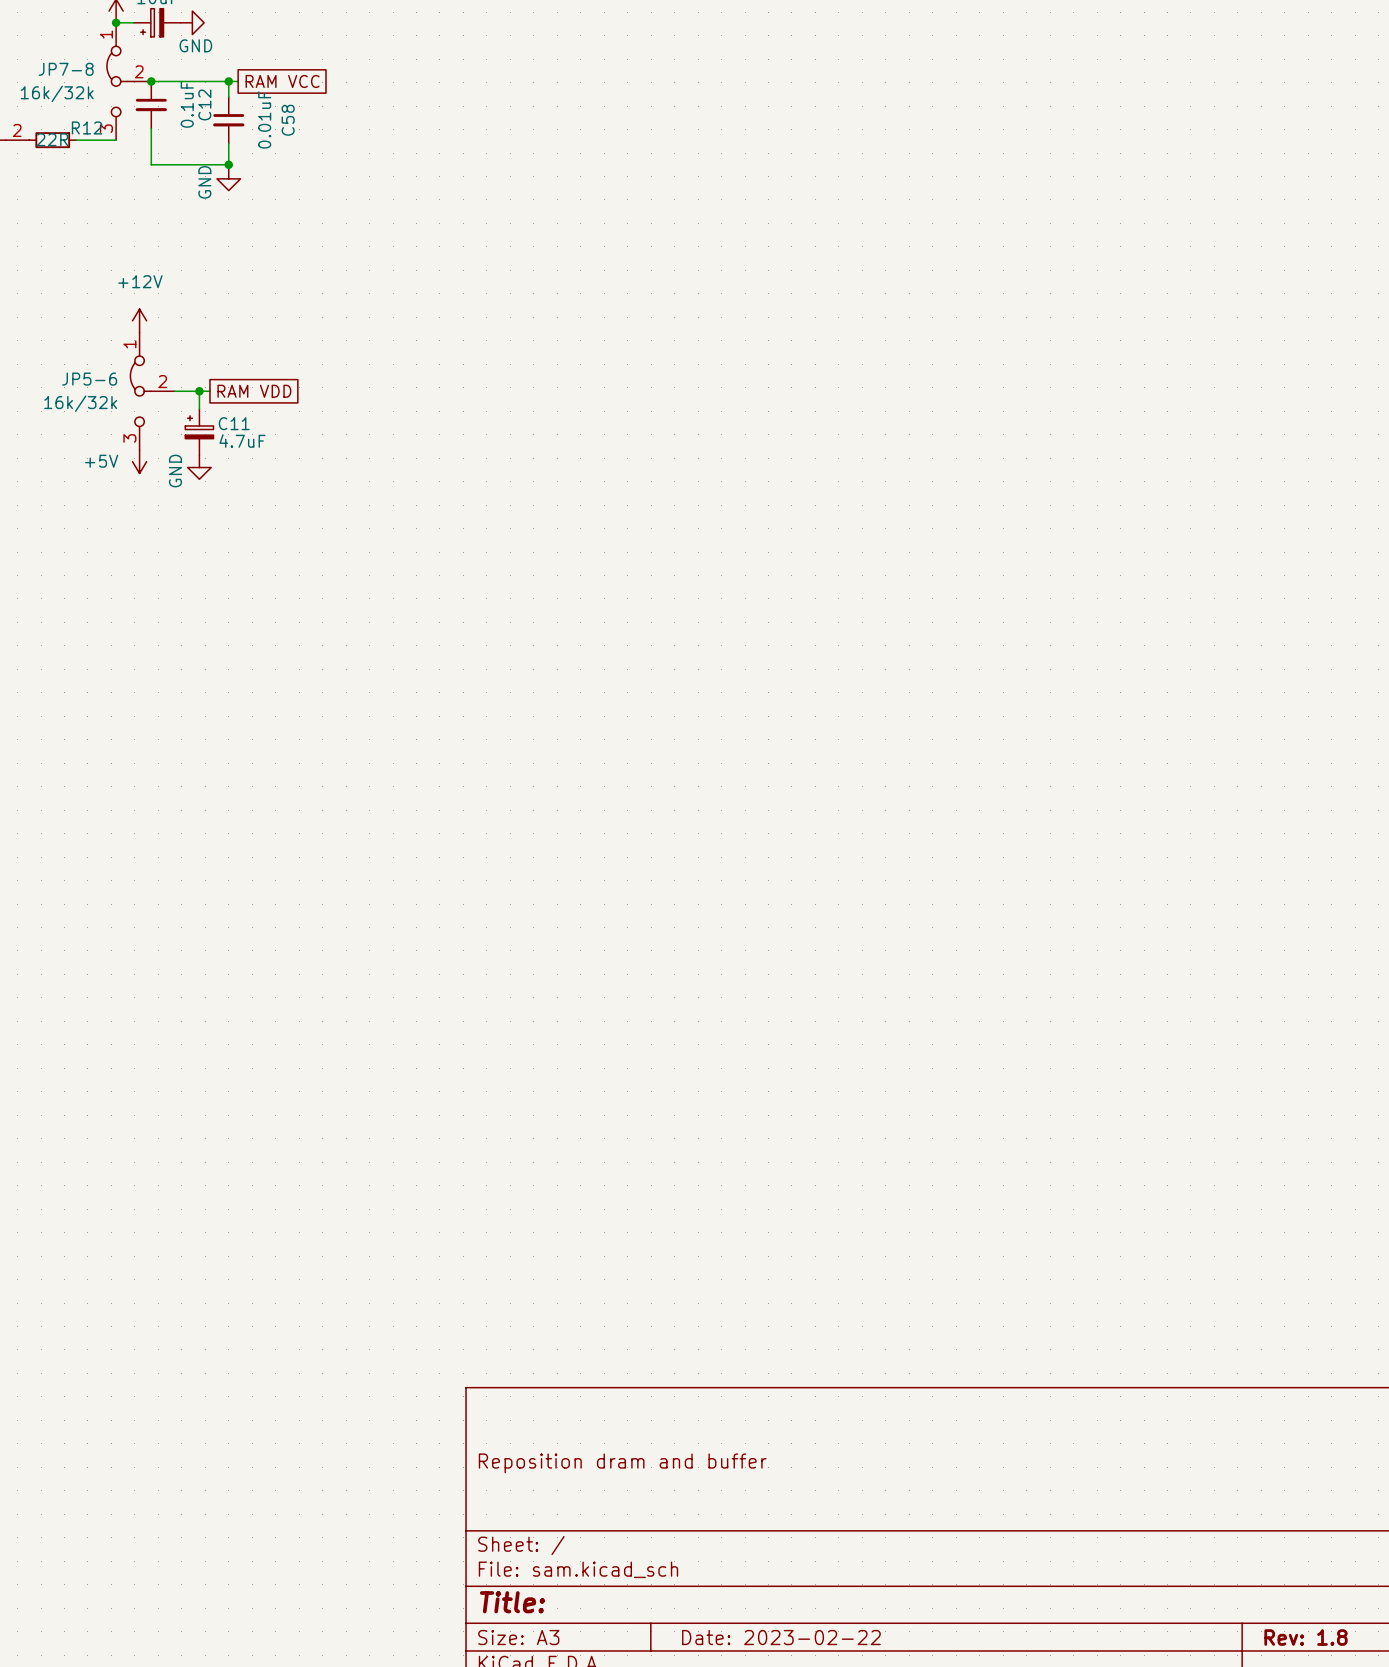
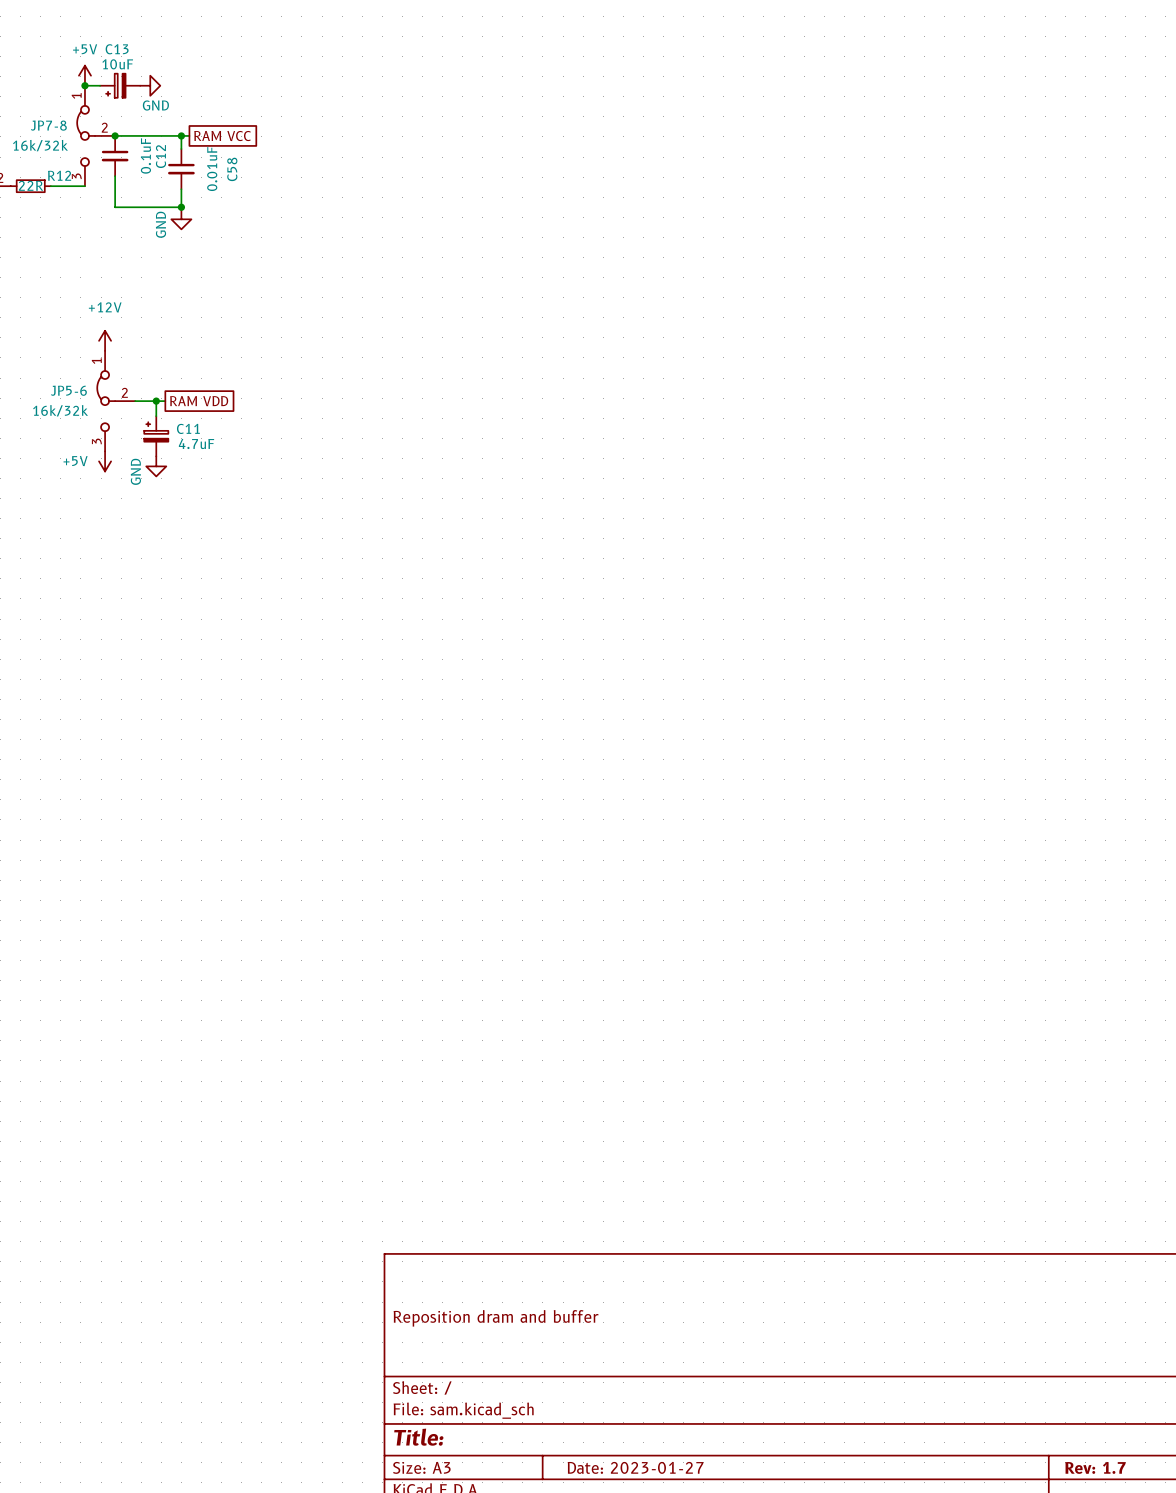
title block: Date: 2023-02-22 (781, 1637) -> Date: 2023-01-27 (635, 1467)
title block: Rev: 1.8 (1306, 1637) -> Rev: 1.7 (1095, 1467)

